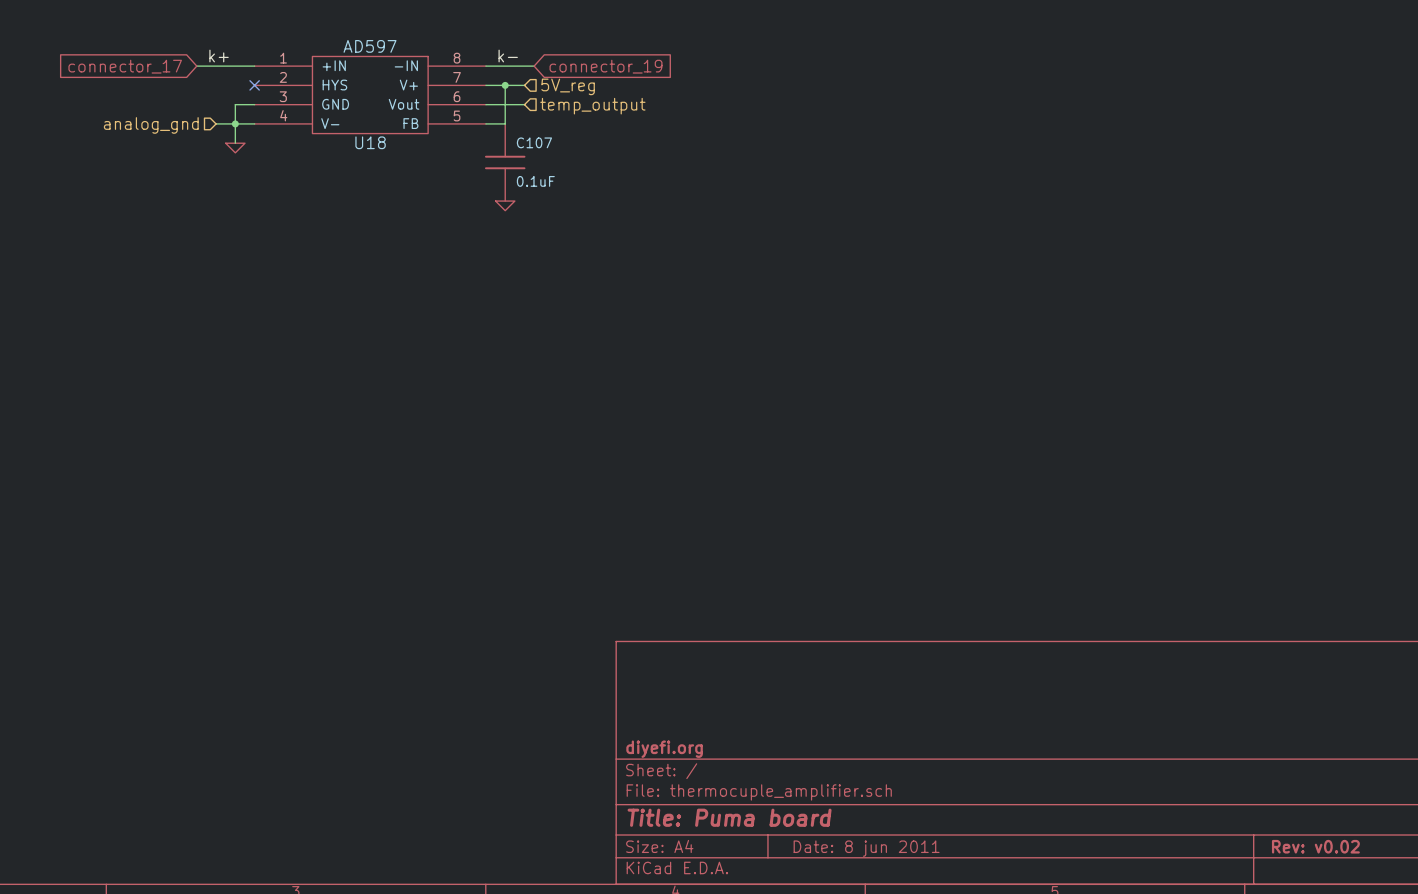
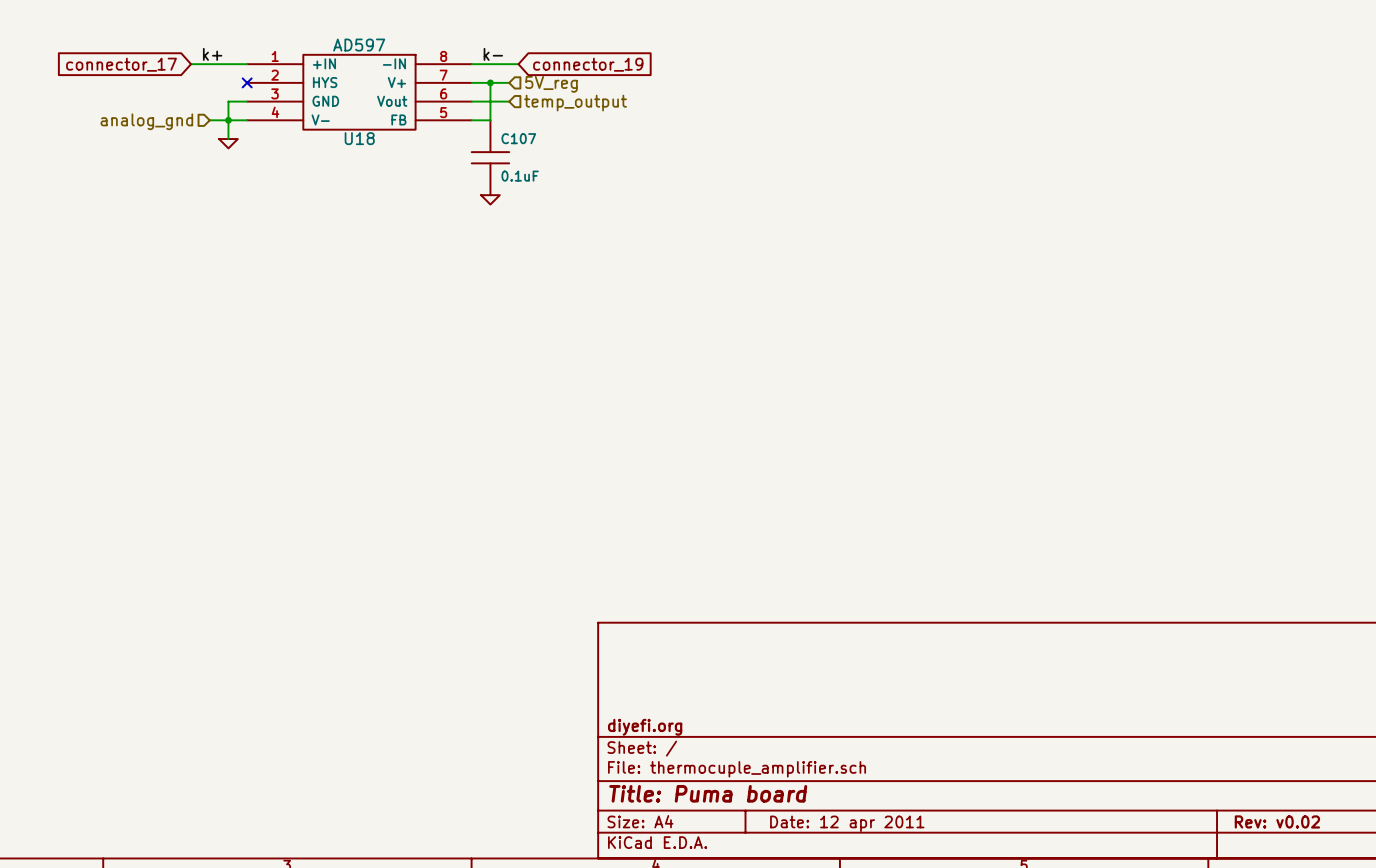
title block: Date: 8 jun 2011 (866, 848) -> Date: 12 apr 2011 (847, 823)

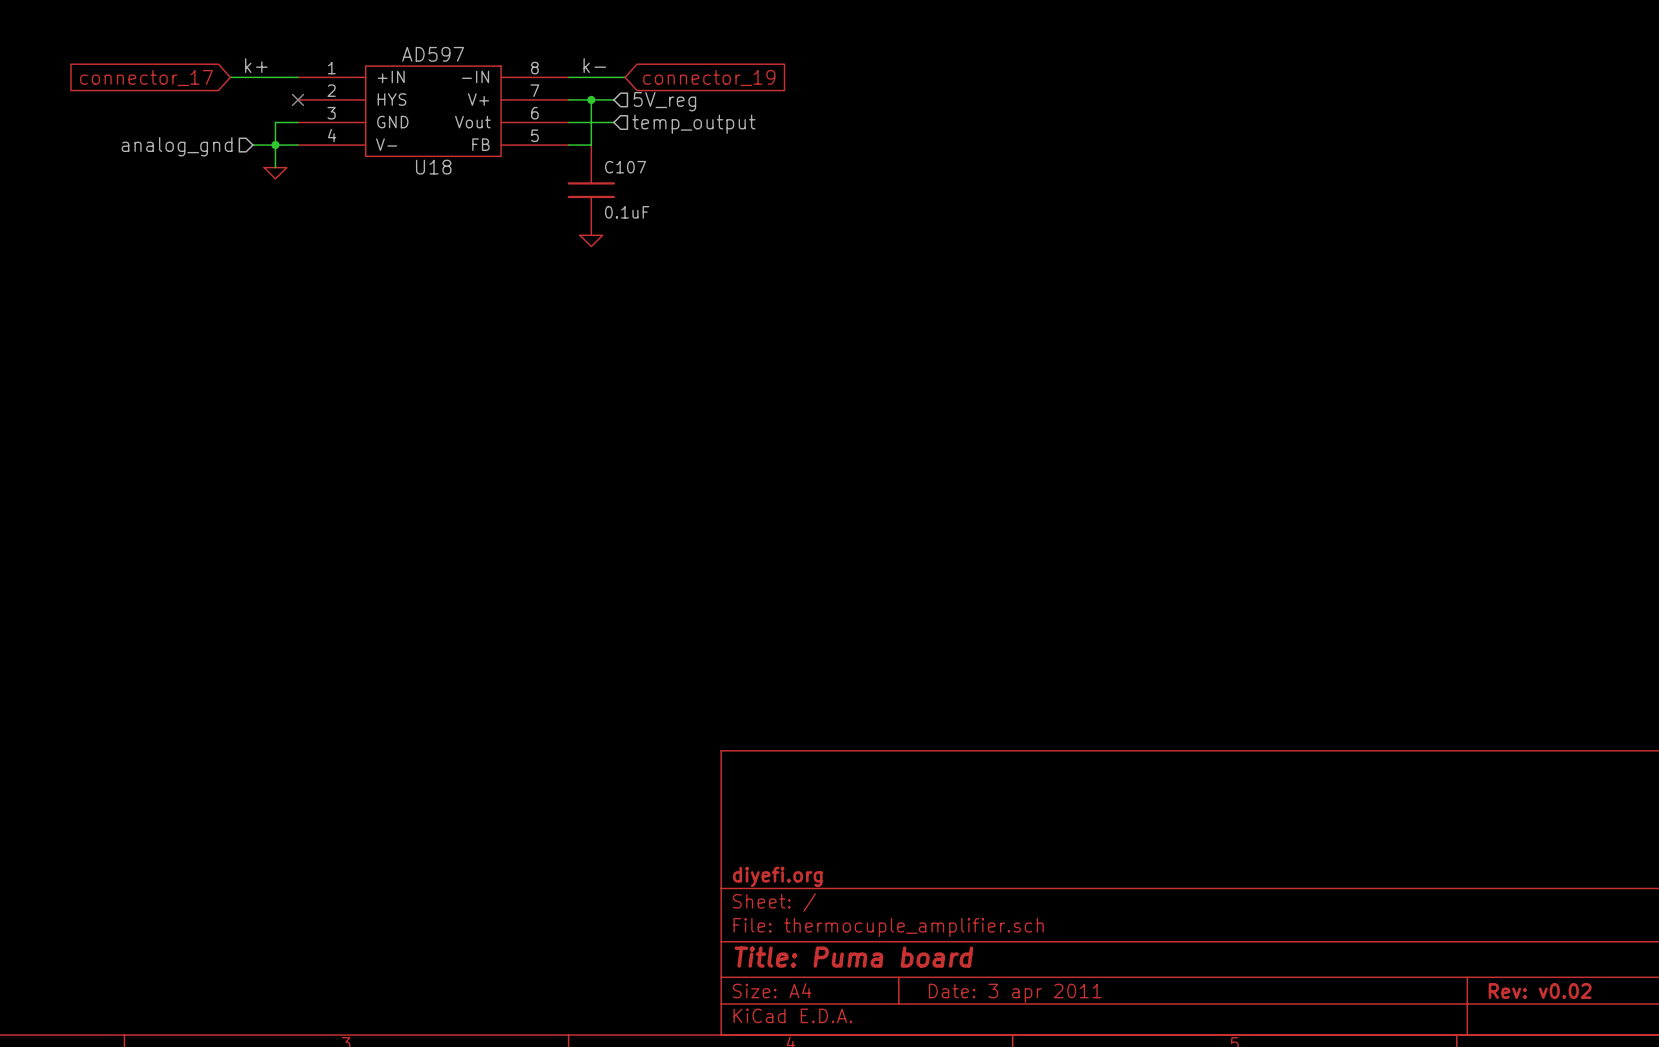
title block: Date: 12 apr 2011 (847, 823) -> Date: 3 apr 2011 (1015, 993)

